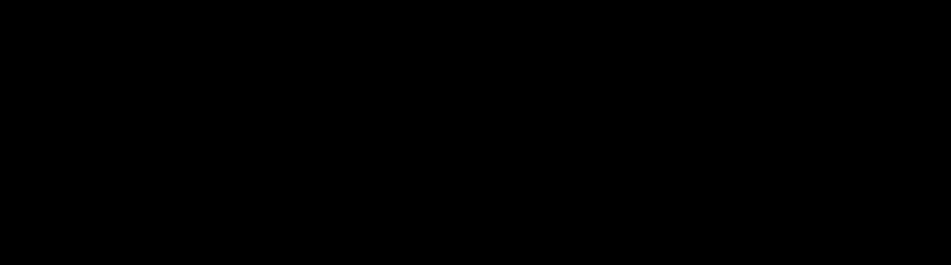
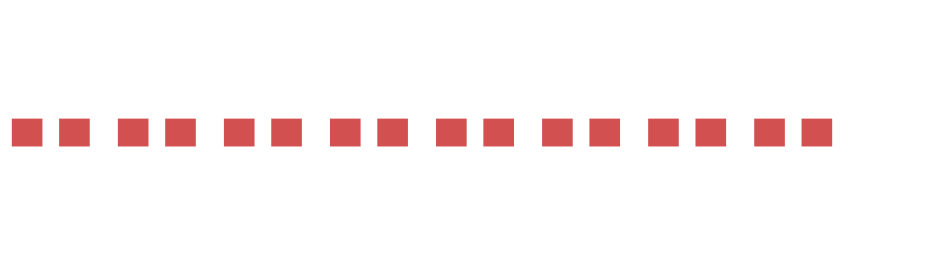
part: none -> (50, 132)
part: none -> (156, 132)
part: none -> (262, 132)
part: none -> (368, 132)
part: none -> (475, 132)
part: none -> (581, 132)
part: none -> (687, 132)
part: none -> (793, 132)

